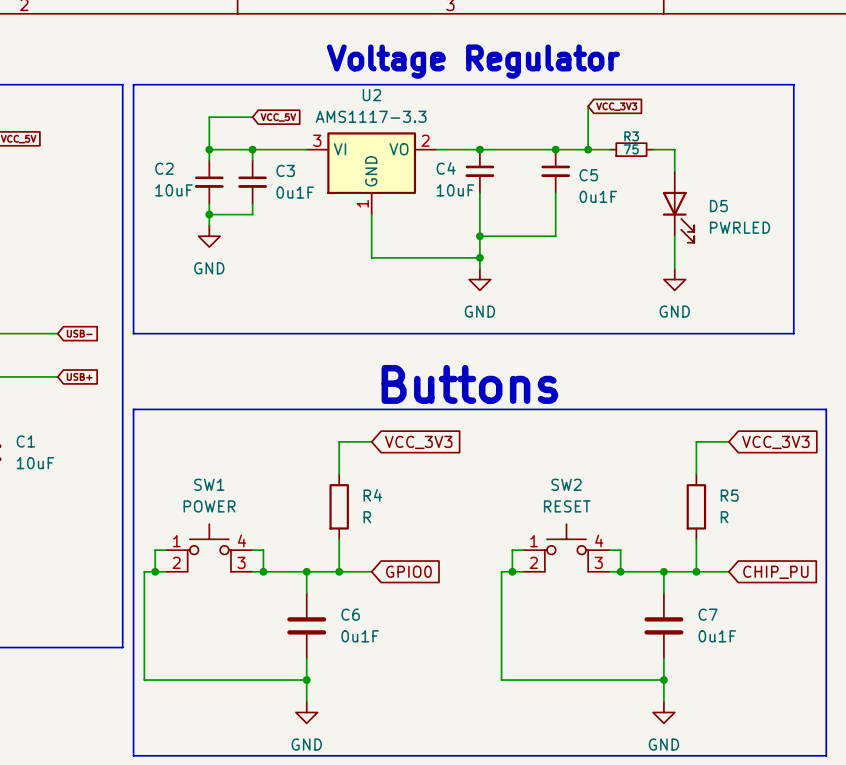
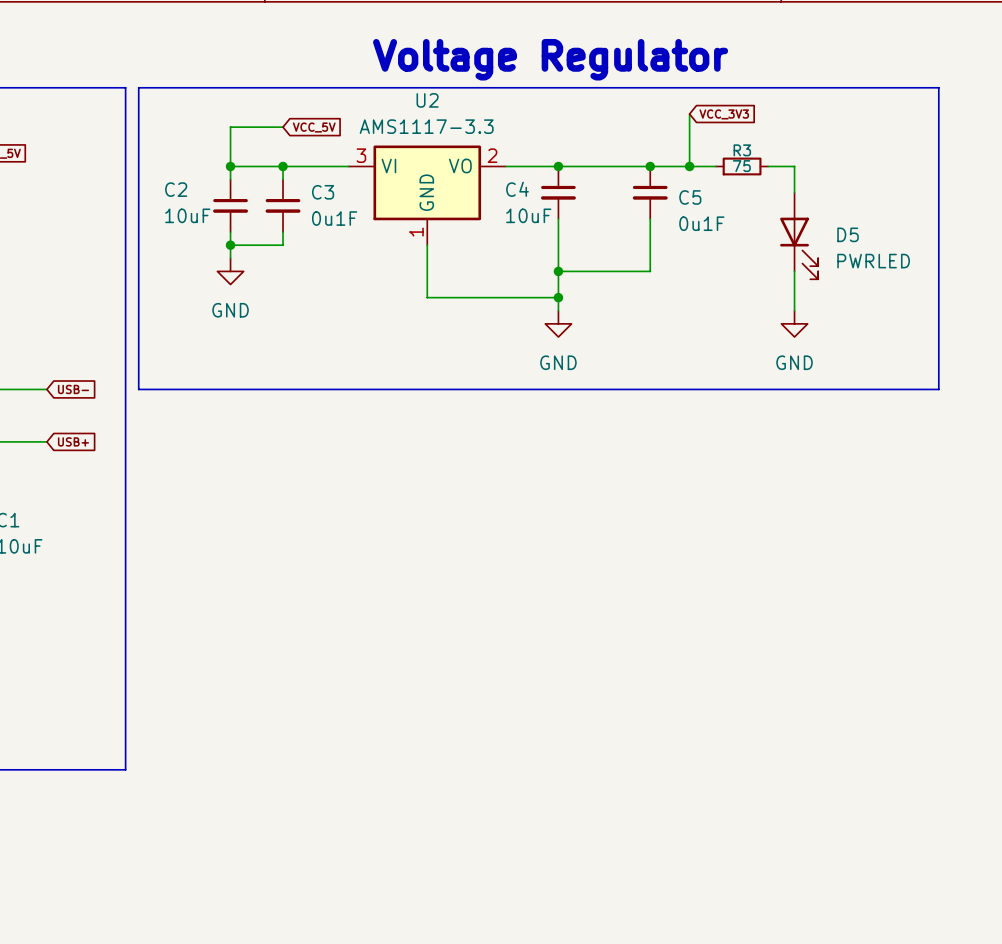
text: Buttons (469, 384) -> none
line: (133, 409) (826, 409) (826, 755) (133, 755) (133, 409) -> none
wire: (371, 441) (339, 441) (339, 474) -> none
wire: (728, 441) (696, 441) (696, 474) -> none
global label: VCC_3V3 (418, 442) -> none
global label: VCC_3V3 (775, 442) -> none
R4: R (339, 506) -> none
R5: R (696, 506) -> none
wire: (339, 539) (339, 571) -> none
wire: (696, 539) (696, 571) -> none
SW1: POWER (209, 547) -> none
SW2: RESET (566, 547) -> none
wire: (166, 550) (155, 550) (155, 571) -> none
wire: (252, 550) (263, 550) (263, 571) -> none
wire: (523, 550) (512, 550) (512, 571) -> none
wire: (609, 550) (620, 550) (620, 571) -> none
junction: (155, 571) -> none
wire: (166, 571) (144, 571) (144, 680) (306, 680) -> none
wire: (252, 571) (371, 571) -> none
junction: (263, 571) -> none
wire: (306, 571) (306, 593) -> none
junction: (306, 571) -> none
junction: (339, 571) -> none
global label: GPIO0 (408, 571) -> none
junction: (512, 571) -> none
wire: (523, 571) (501, 571) (501, 680) (663, 680) -> none
wire: (609, 571) (728, 571) -> none
junction: (620, 571) -> none
wire: (663, 571) (663, 593) -> none
junction: (663, 571) -> none
junction: (696, 571) -> none
global label: CHIP_PU (775, 572) -> none
C6: 0u1F (306, 625) -> none
C7: 0u1F (663, 625) -> none
wire: (306, 658) (306, 701) -> none
wire: (663, 658) (663, 701) -> none
junction: (306, 680) -> none
junction: (663, 680) -> none
power symbol: GND (306, 712) -> none
power symbol: GND (663, 712) -> none

